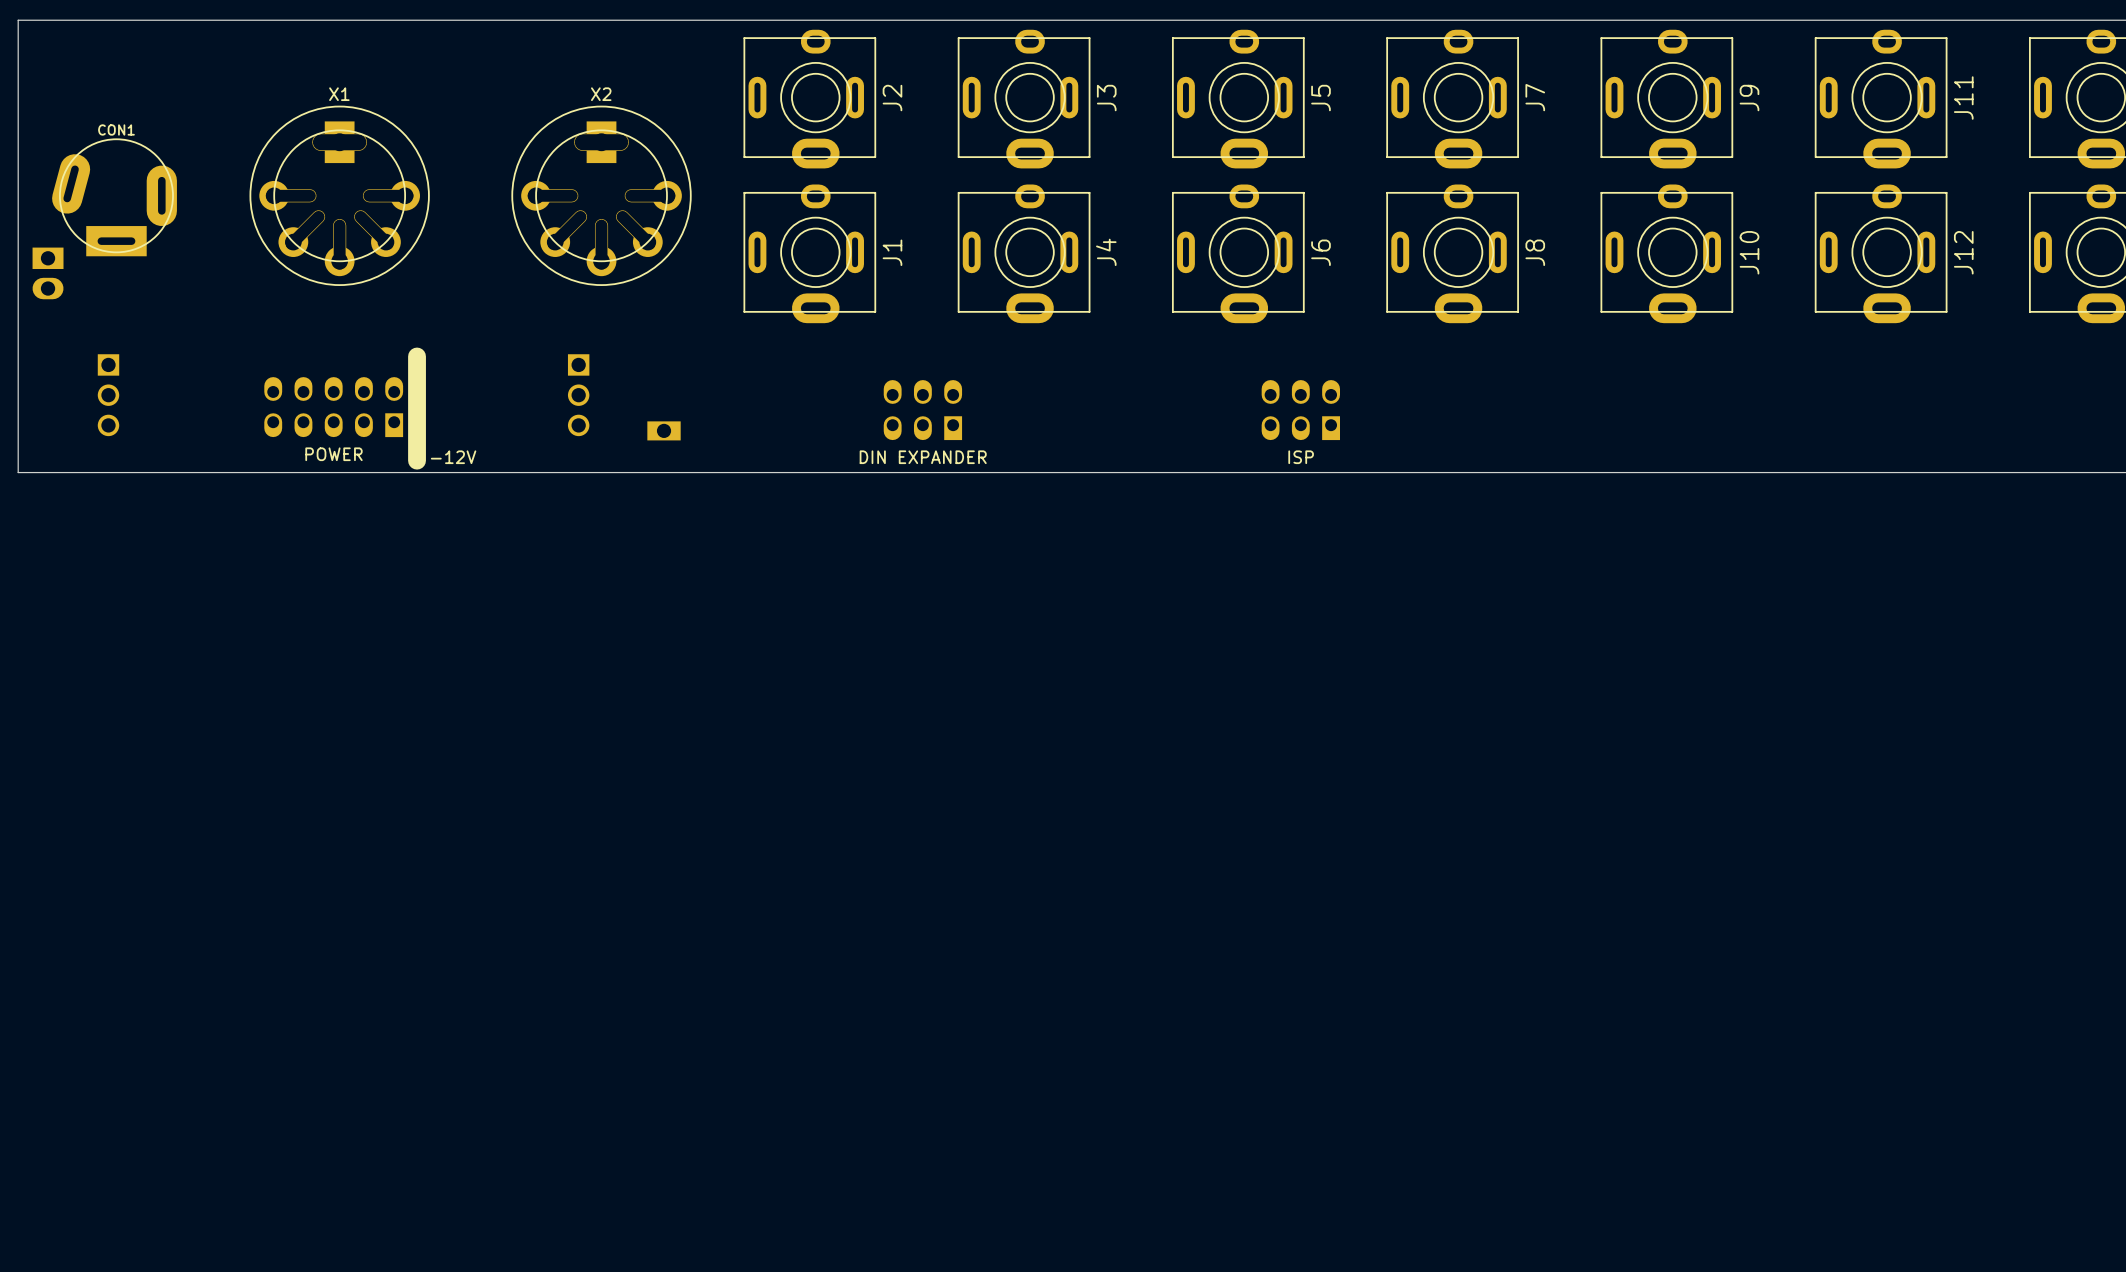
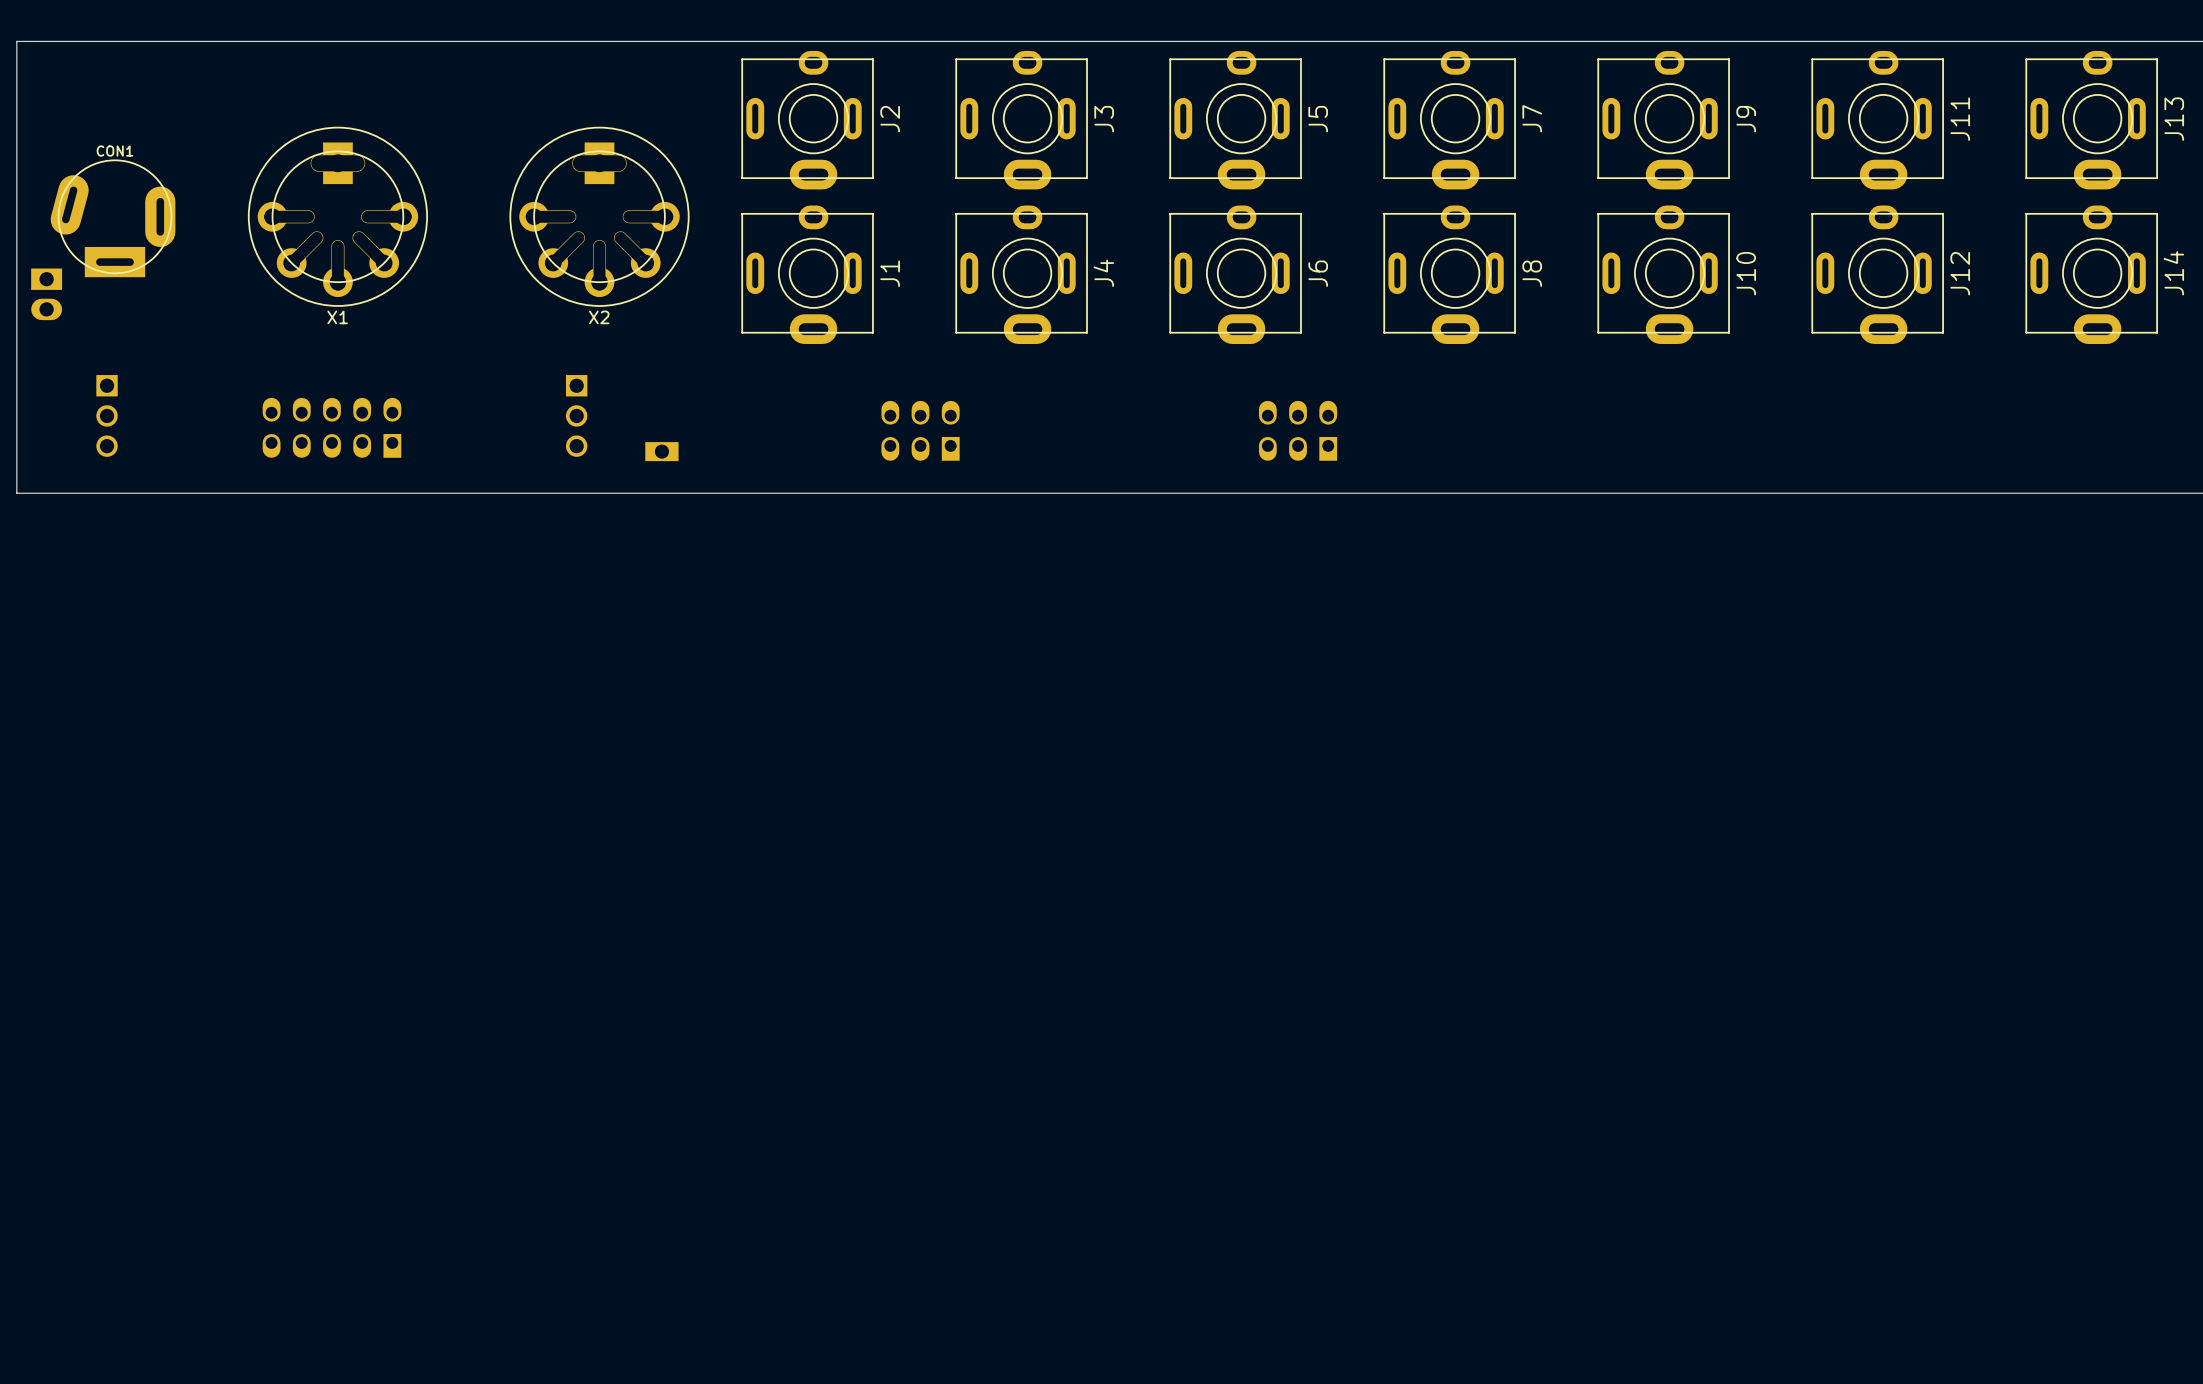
X1 name position: X1 (339, 94) -> X1 (337, 317)
X2 name position: X2 (601, 94) -> X2 (599, 317)
line: (417, 356) (417, 460) -> none
text: POWER (333, 454) -> none
text: −12V (453, 457) -> none
text: DIN EXPANDER (923, 457) -> none
text: ISP (1301, 457) -> none

